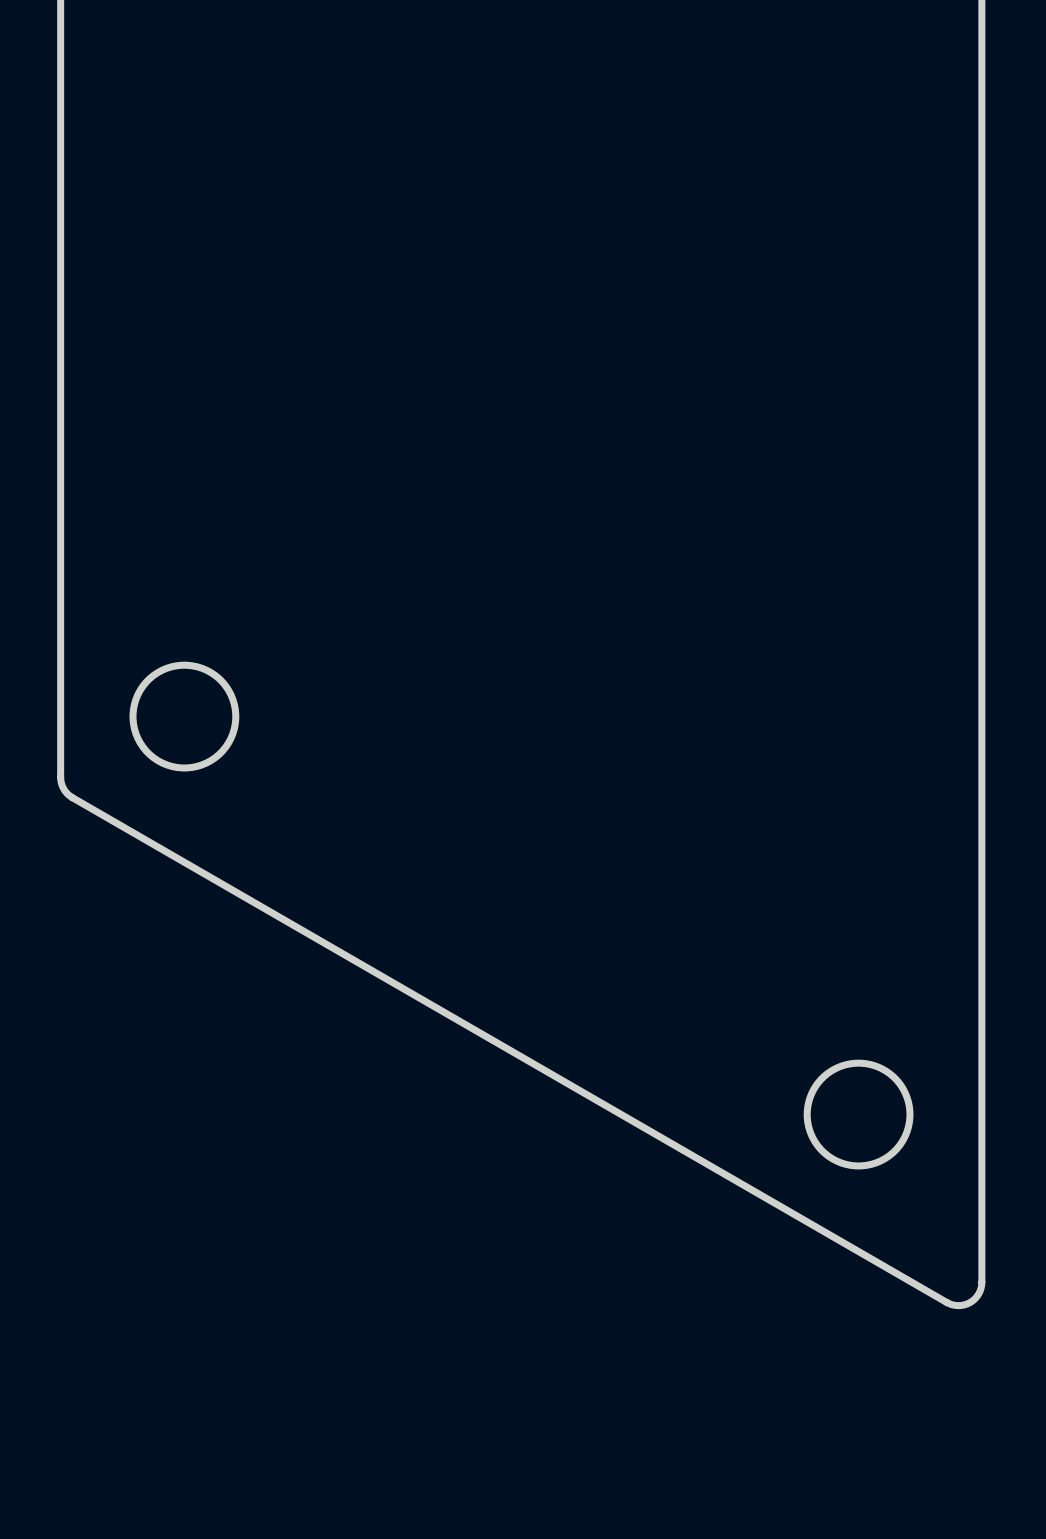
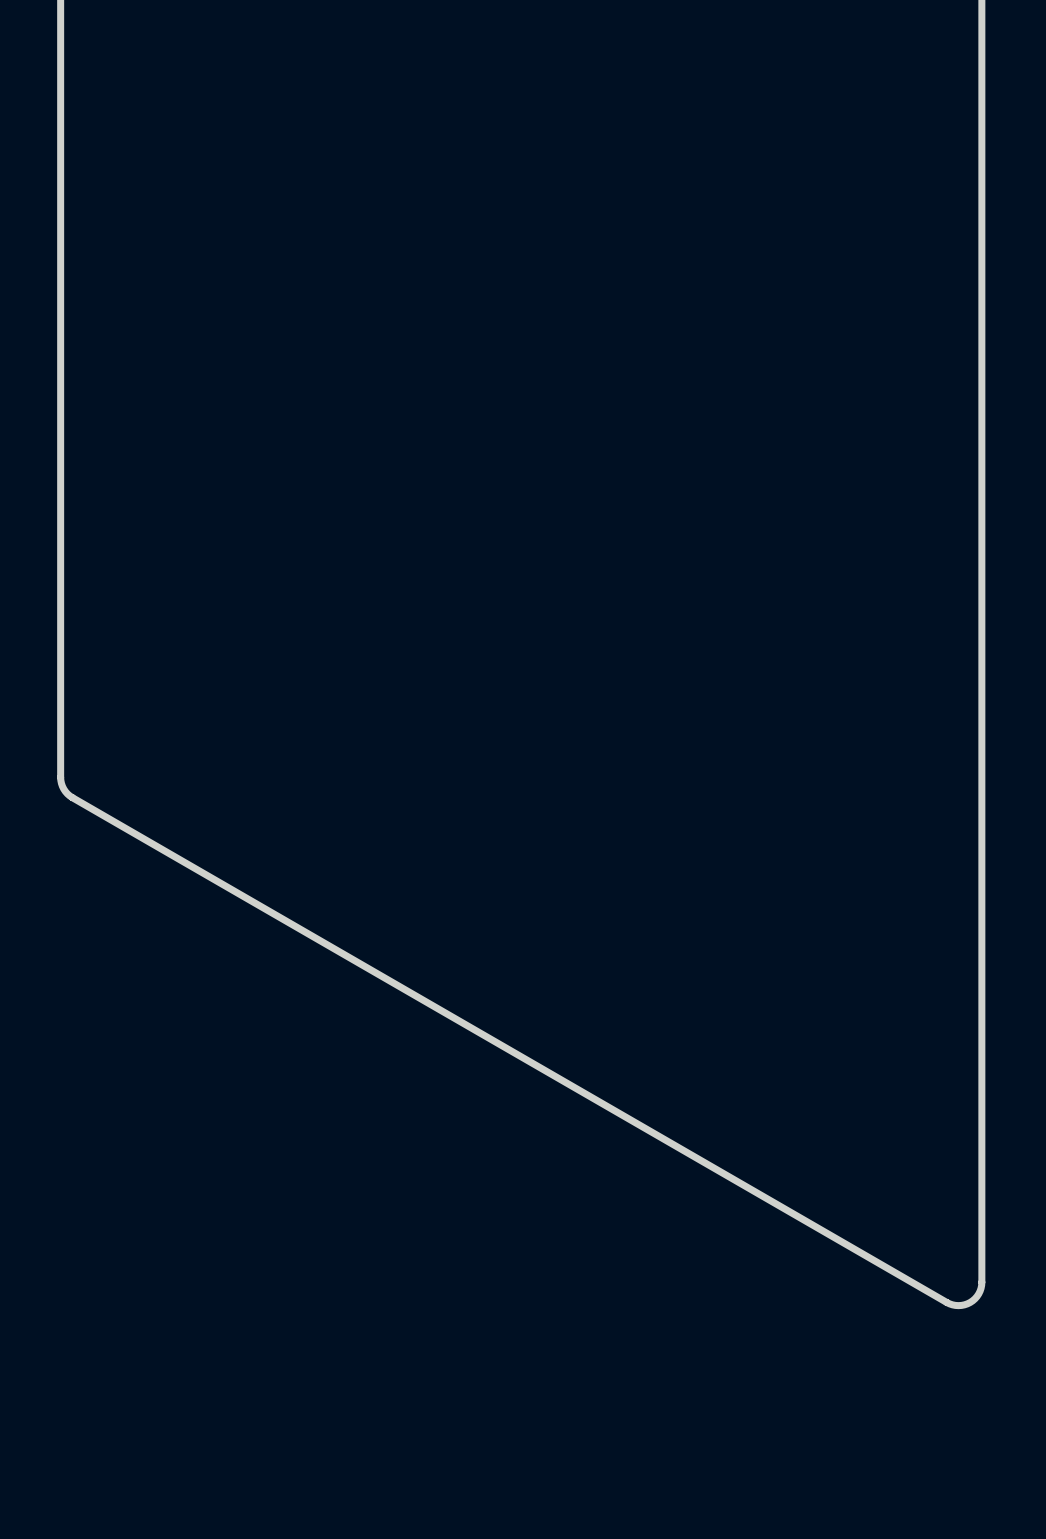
round board edge: [129, 661, 240, 772] -> none
round board edge: [803, 1059, 914, 1170] -> none

